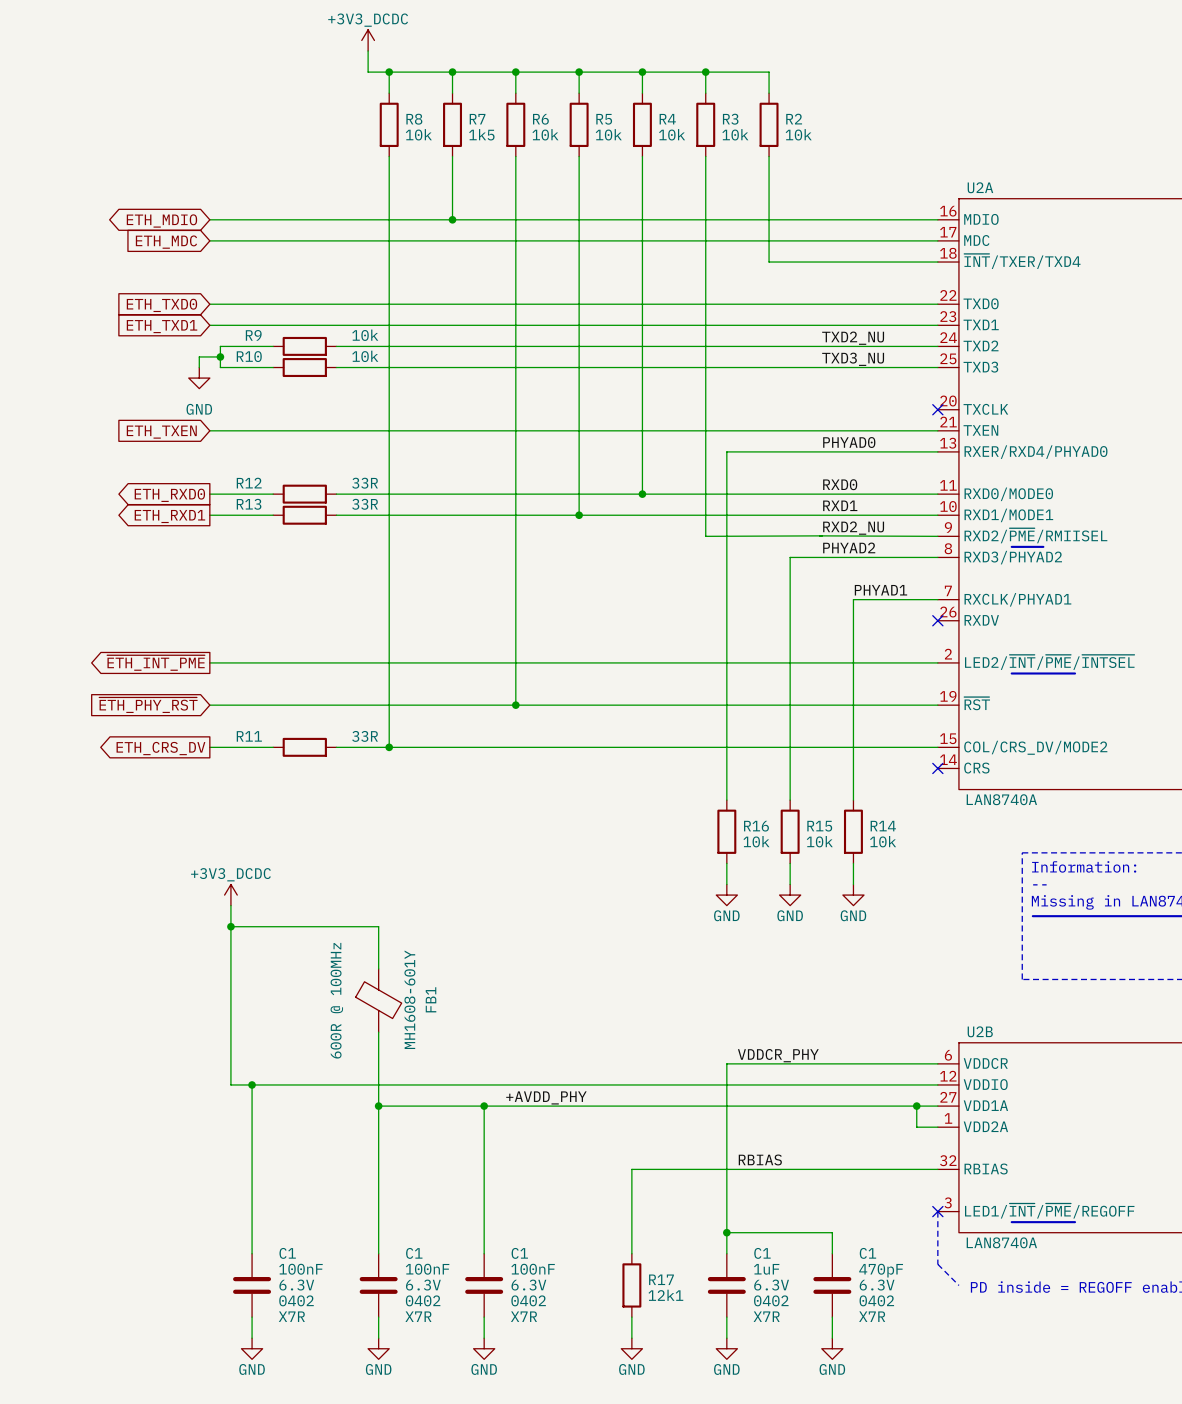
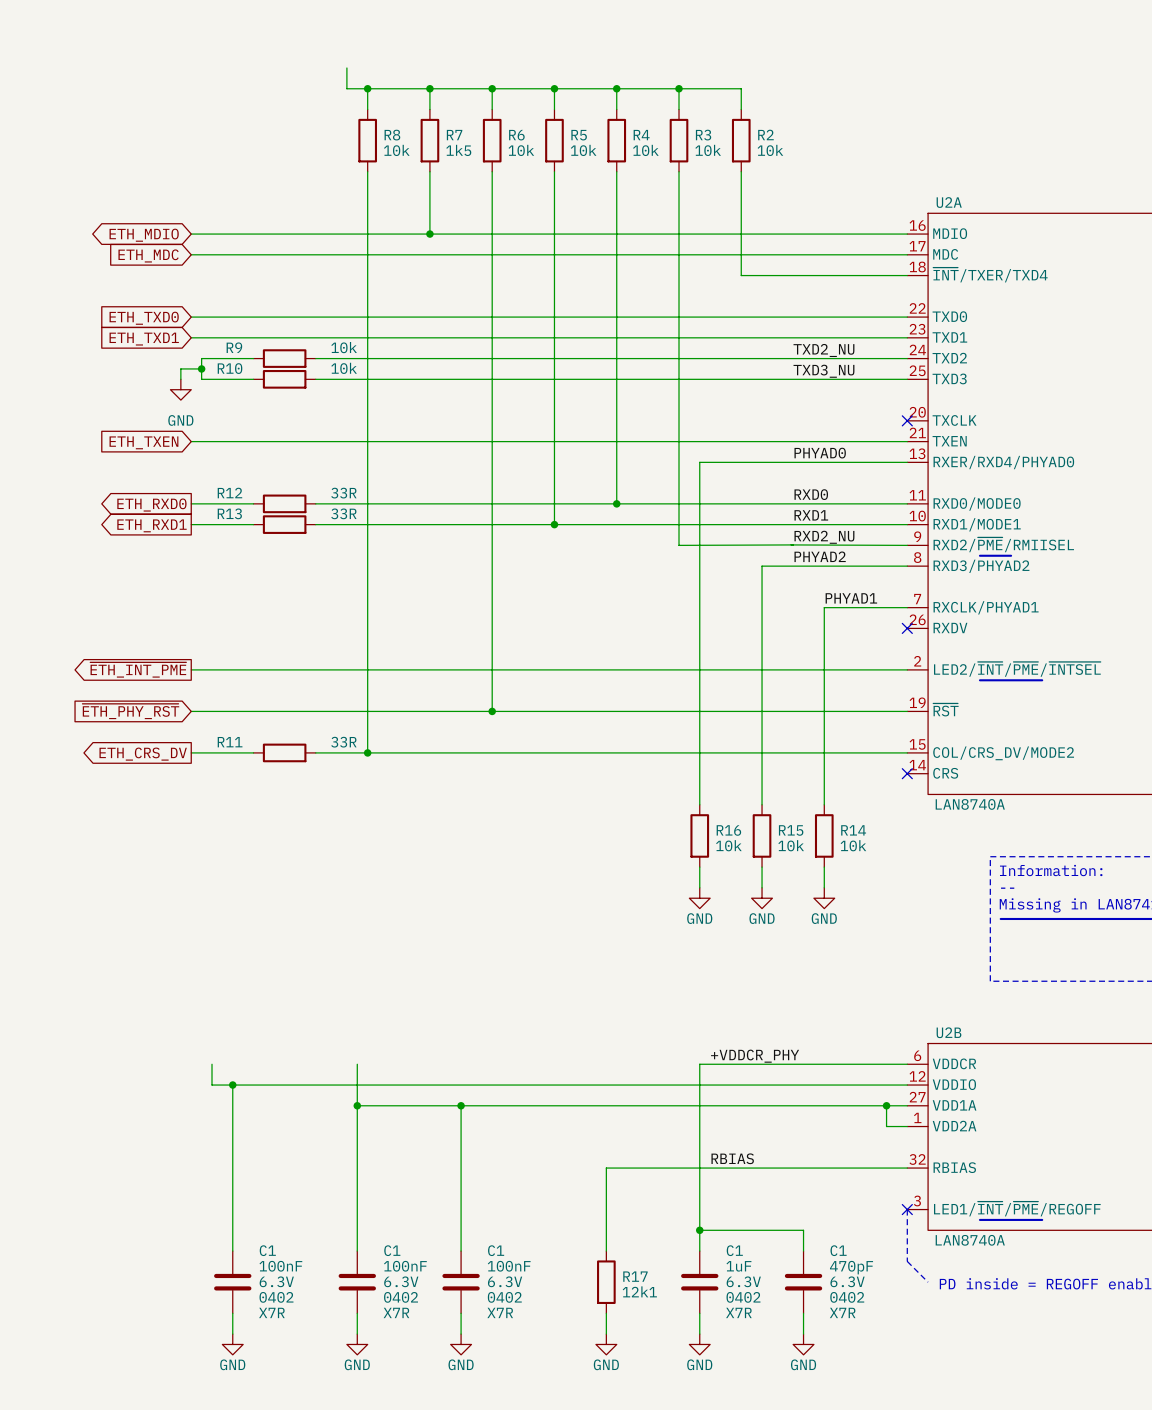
power symbol: +3V3_DCDC (368, 40) -> none
power symbol: +3V3_DCDC (230, 895) -> none
wire: (230, 905) (230, 1063) -> none
wire: (230, 926) (378, 926) (378, 968) -> none
junction: (230, 926) -> none
FB1: MH1608-601Y (378, 1000) -> none
wire: (378, 1032) (378, 1063) -> none
label: VDDCR_PHY (778, 1055) -> +VDDCR_PHY (755, 1056)
label: +AVDD_PHY (546, 1097) -> none

